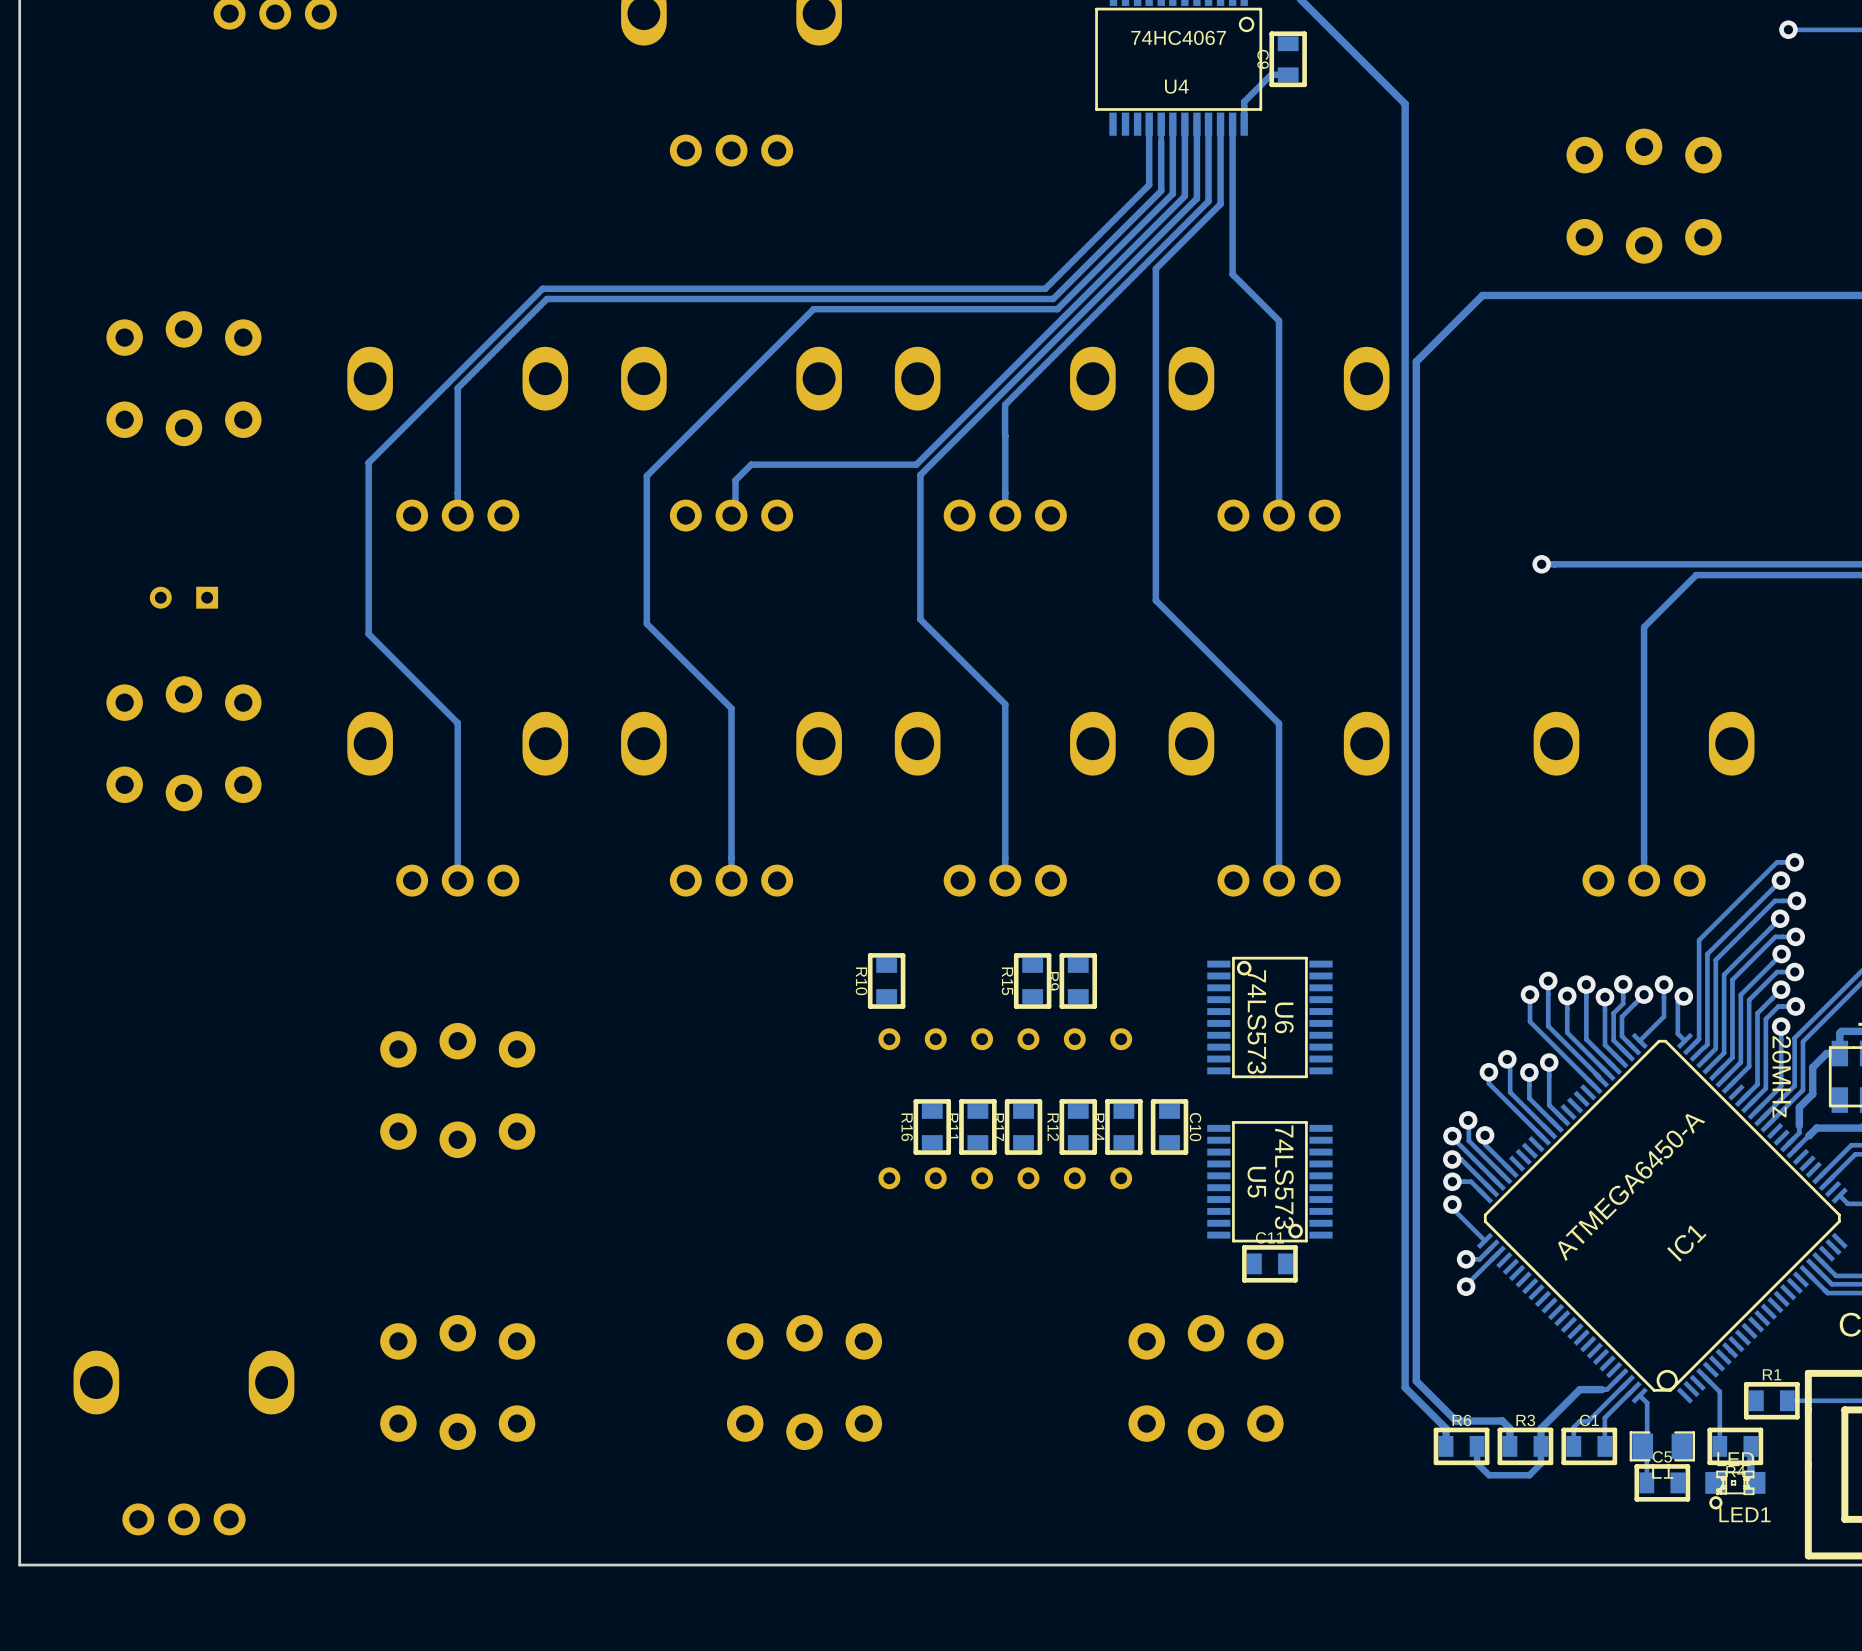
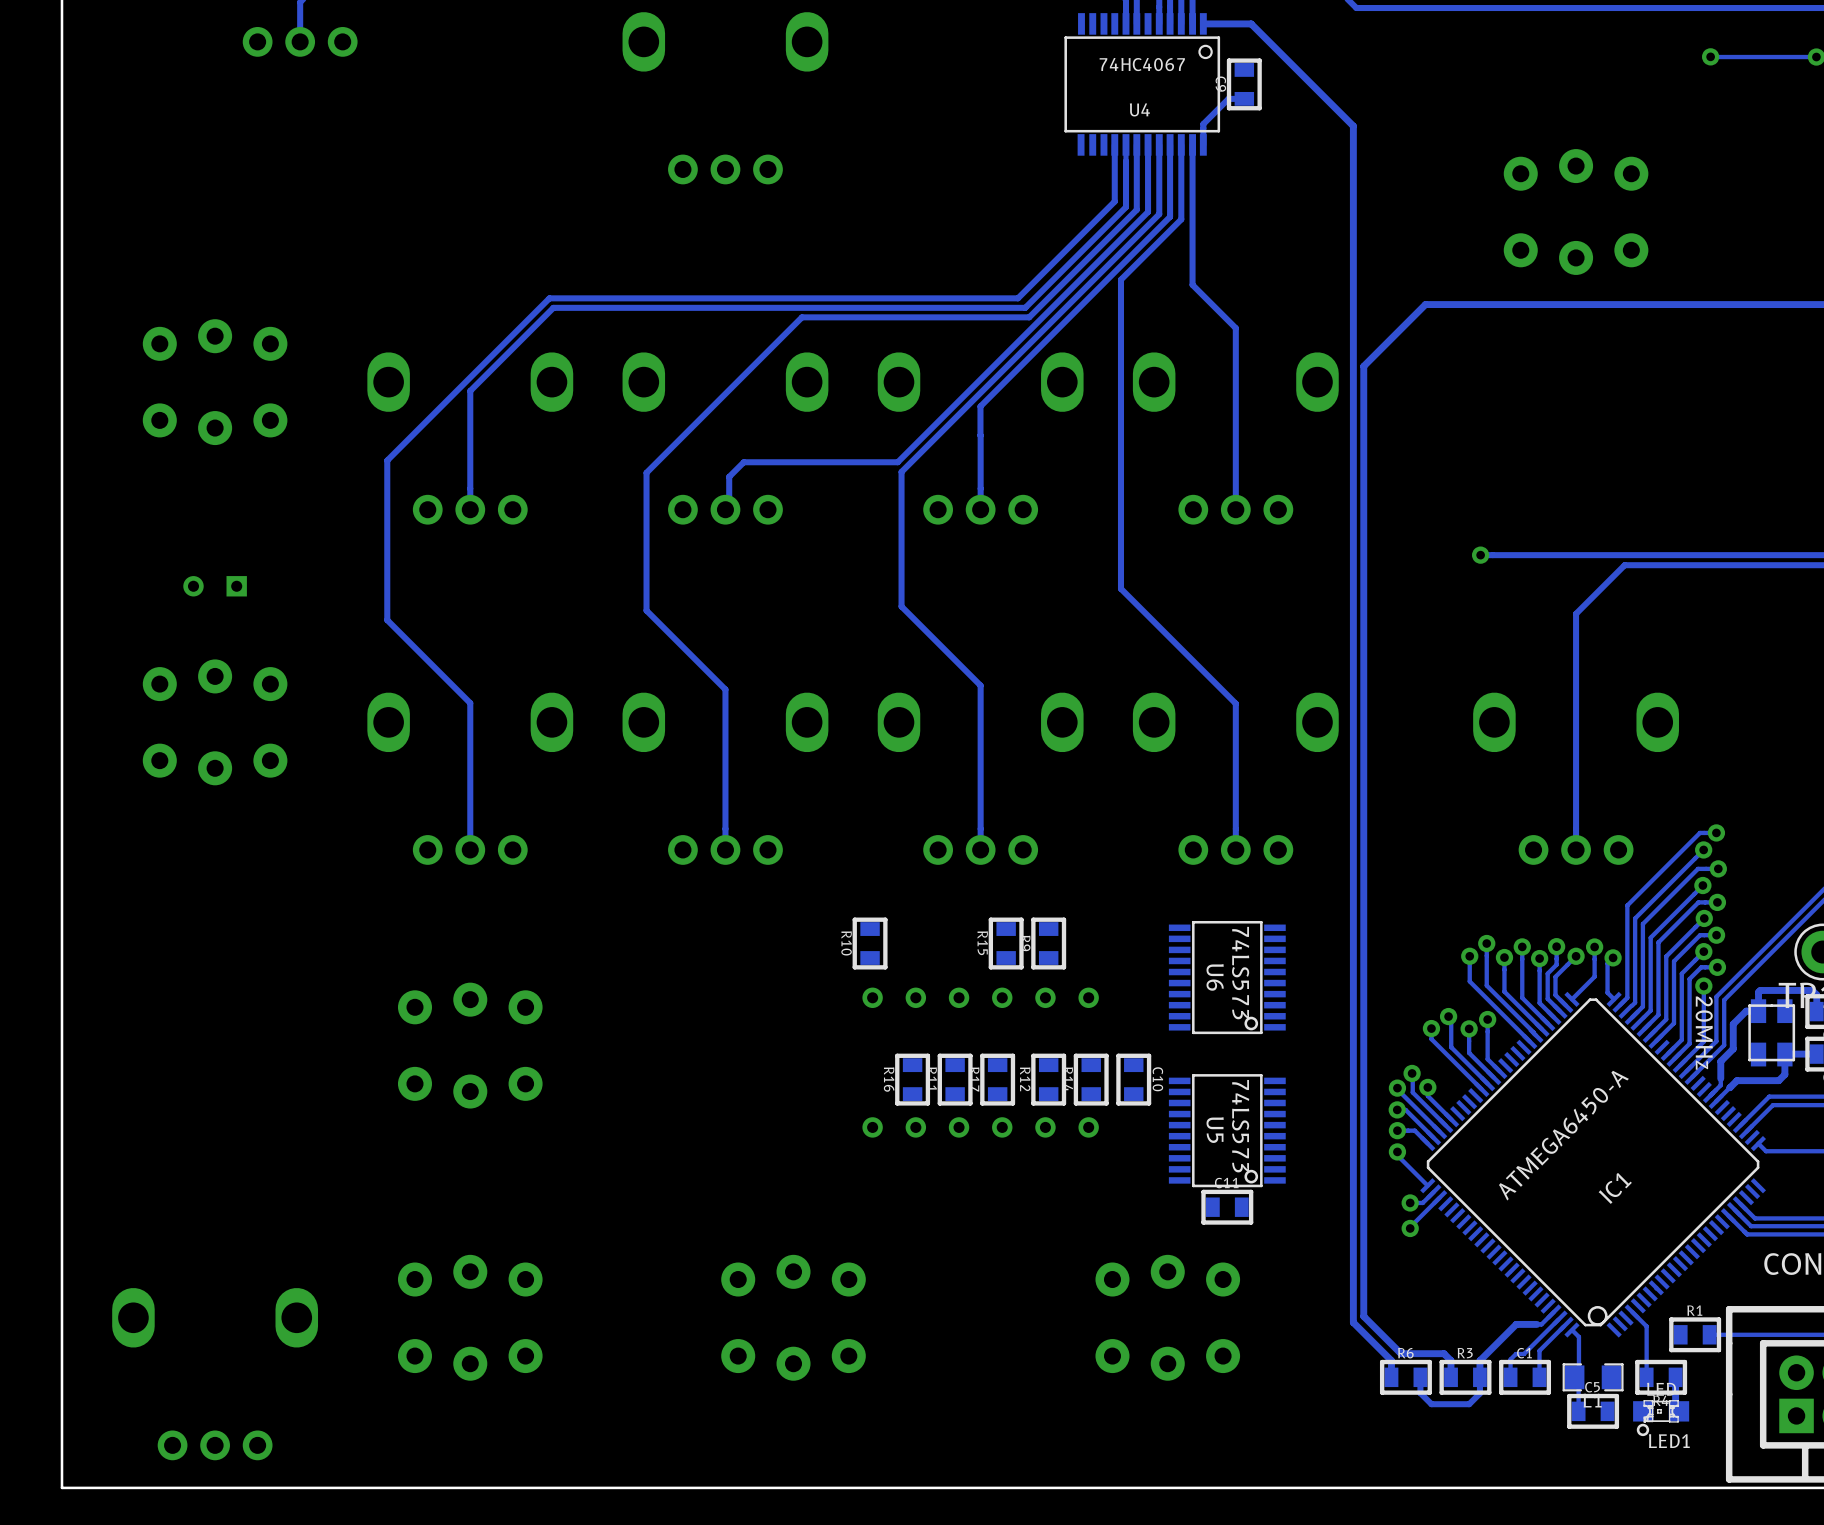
U6 rotation: 0° (1269, 1017) -> 180° (1227, 977)

